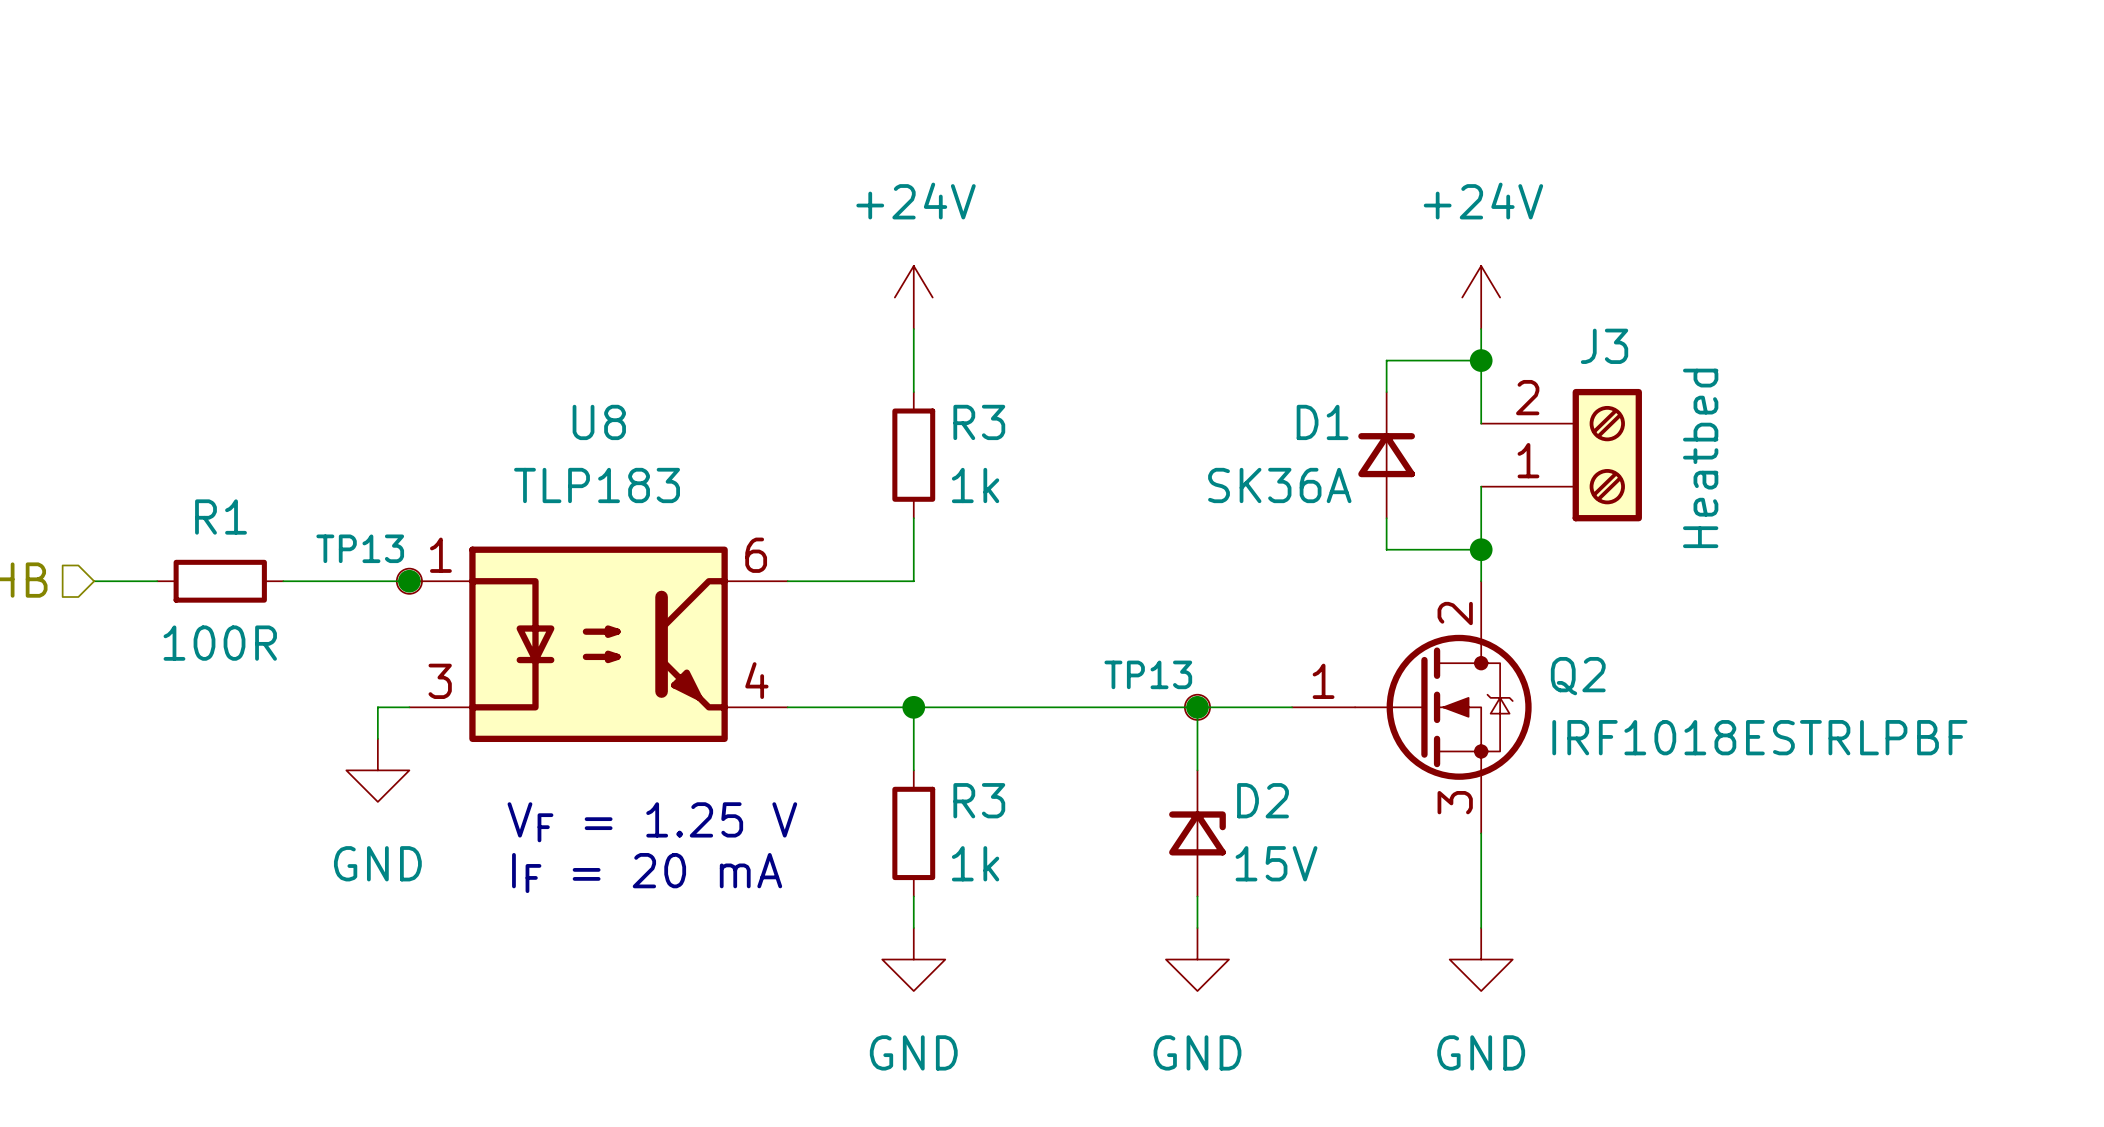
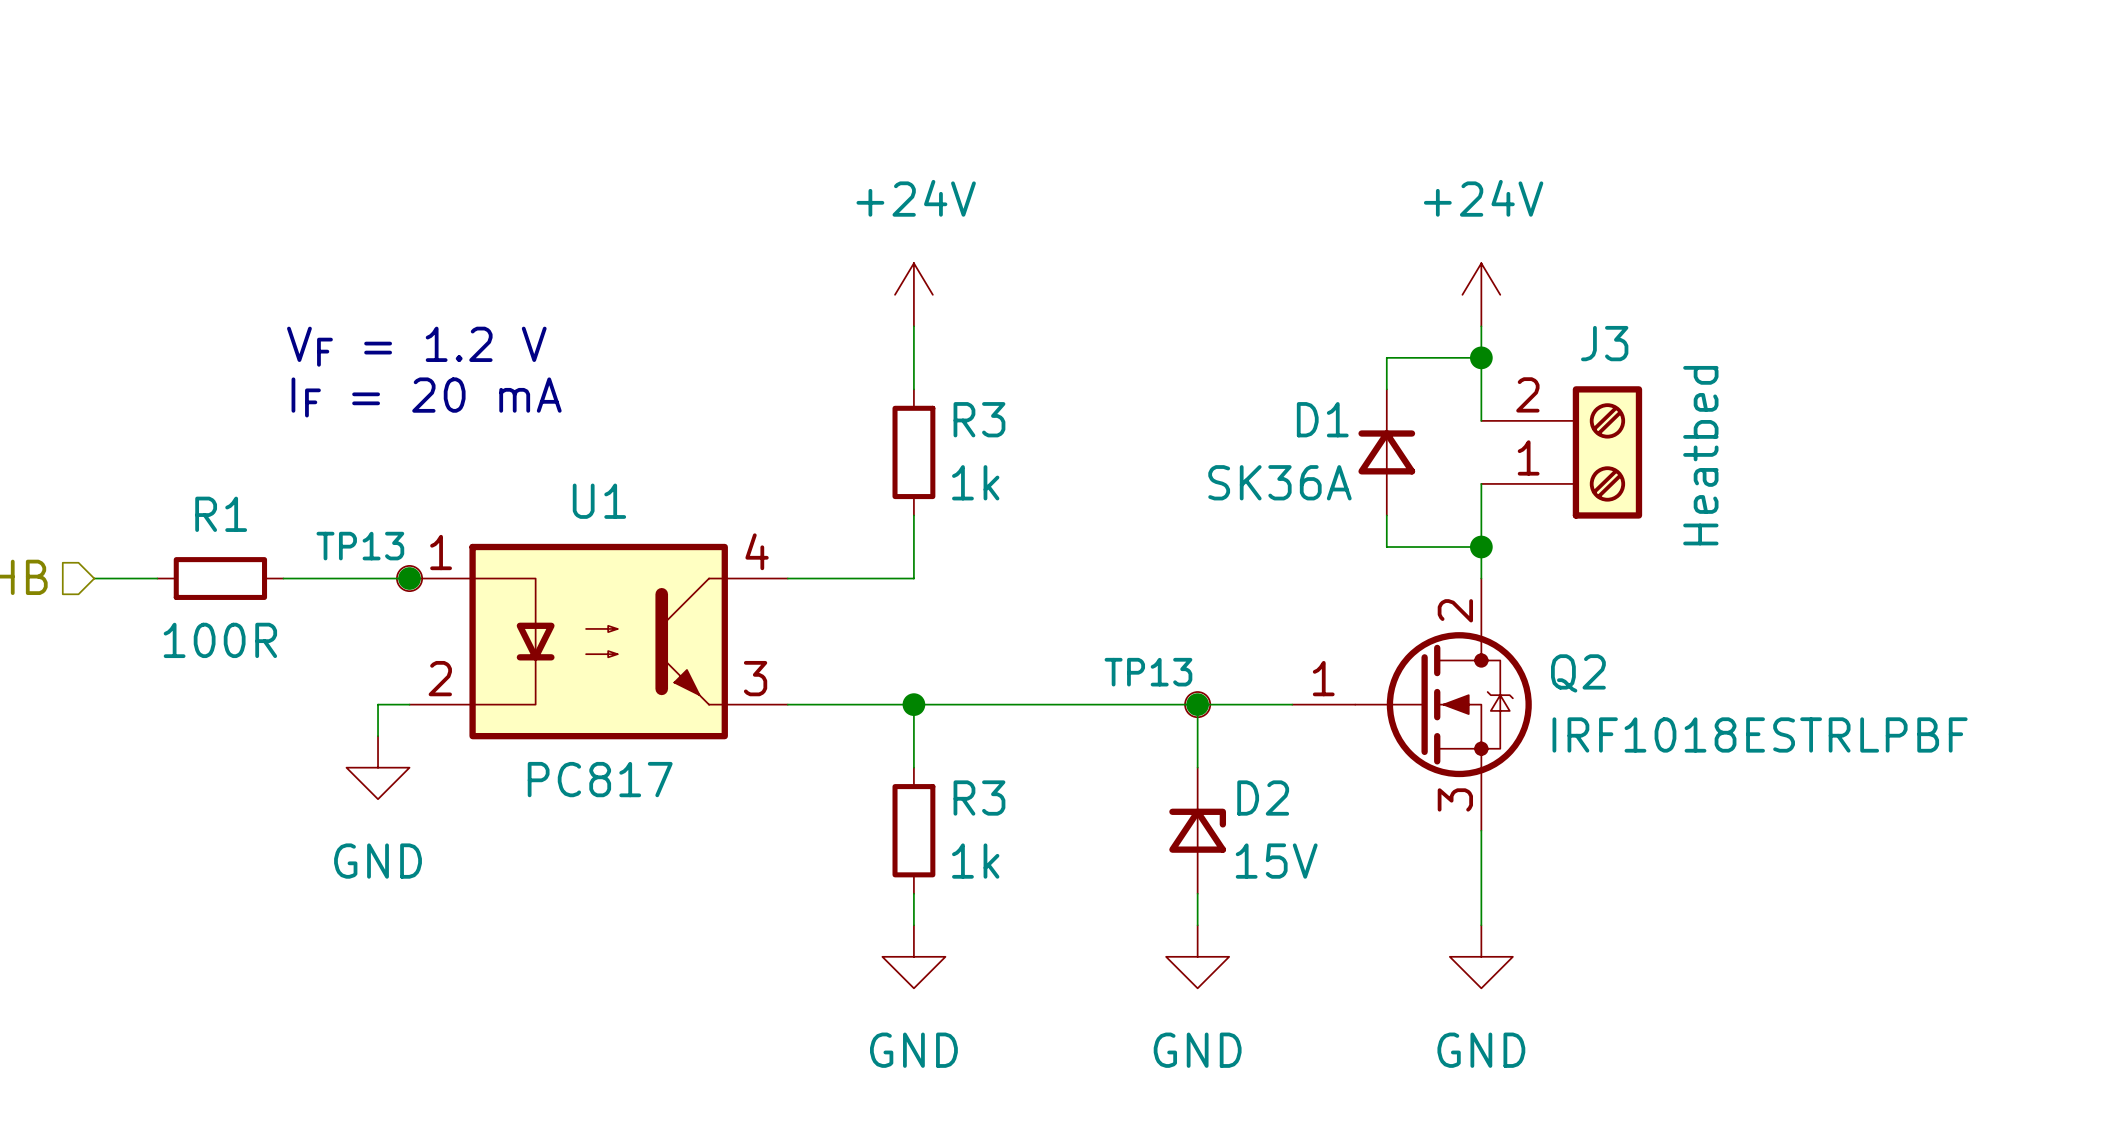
text: none -> VF = 1.2 V (416, 346)
U8: TLP183 (598, 644) -> none
U1: none -> PC817 (598, 641)
text: VF = 1.25 V (652, 822) -> none
text position: IF = 20 mA (647, 873) -> IF = 20 mA (426, 397)

